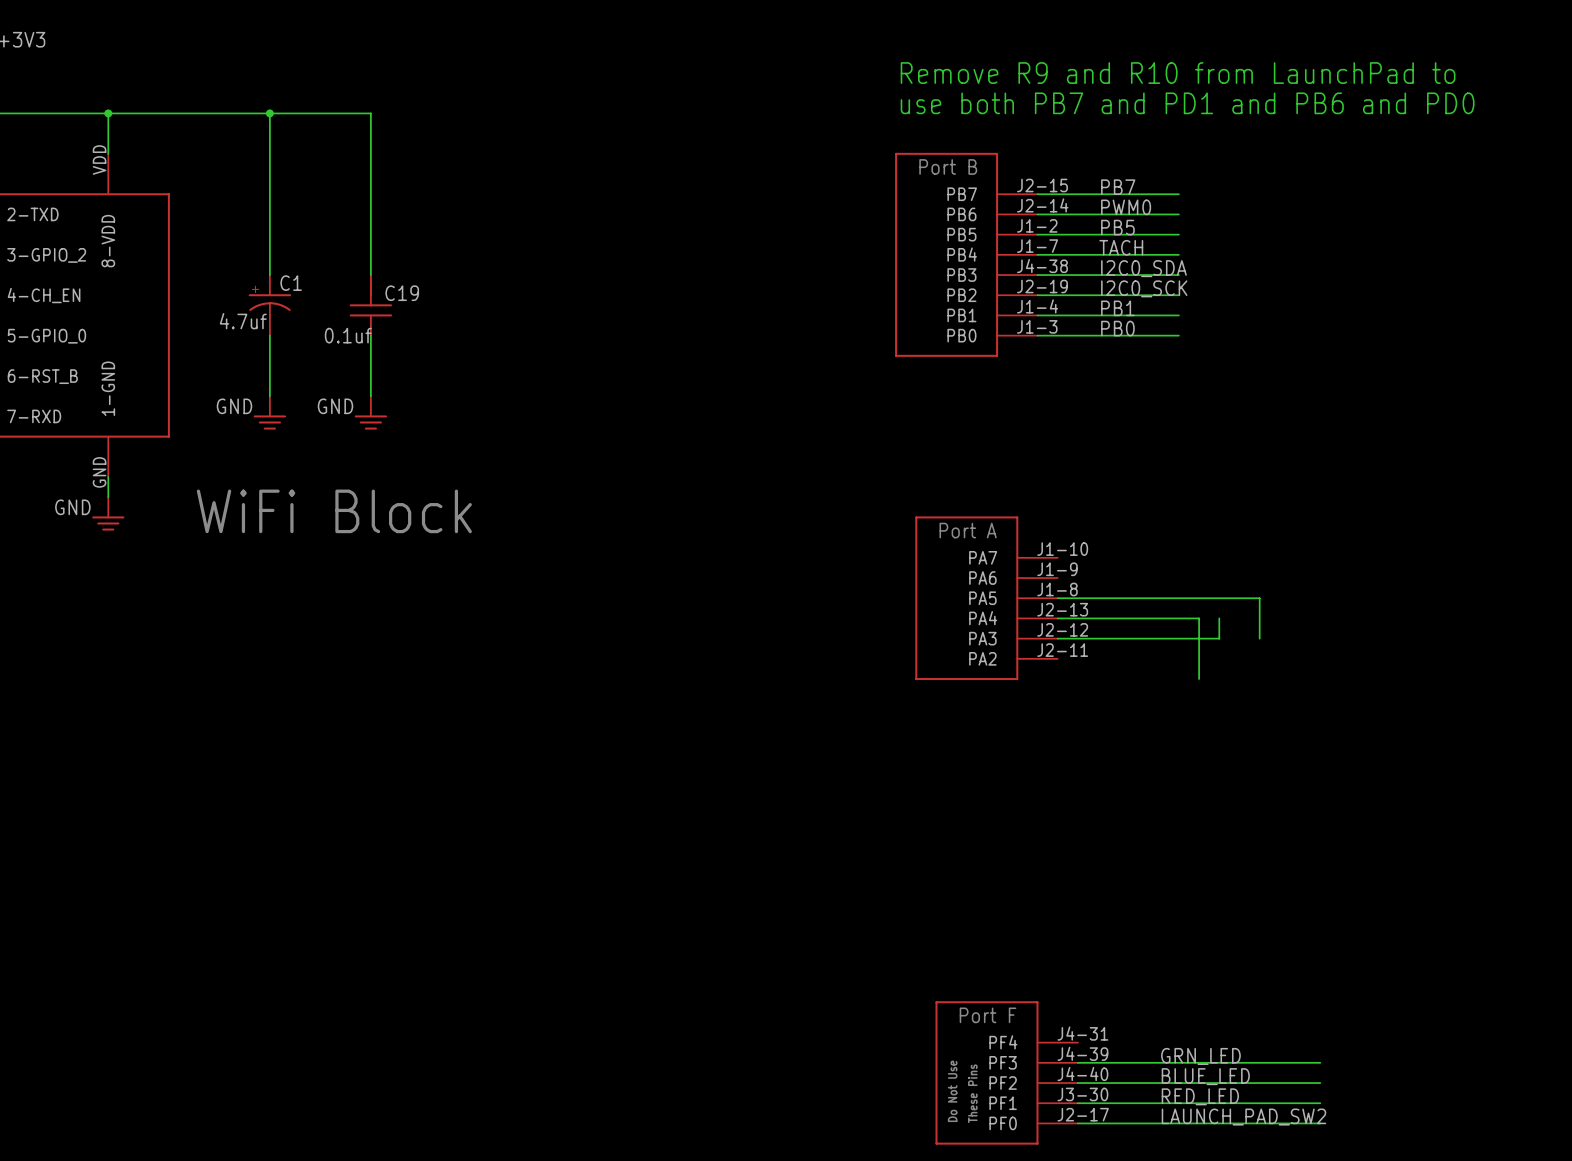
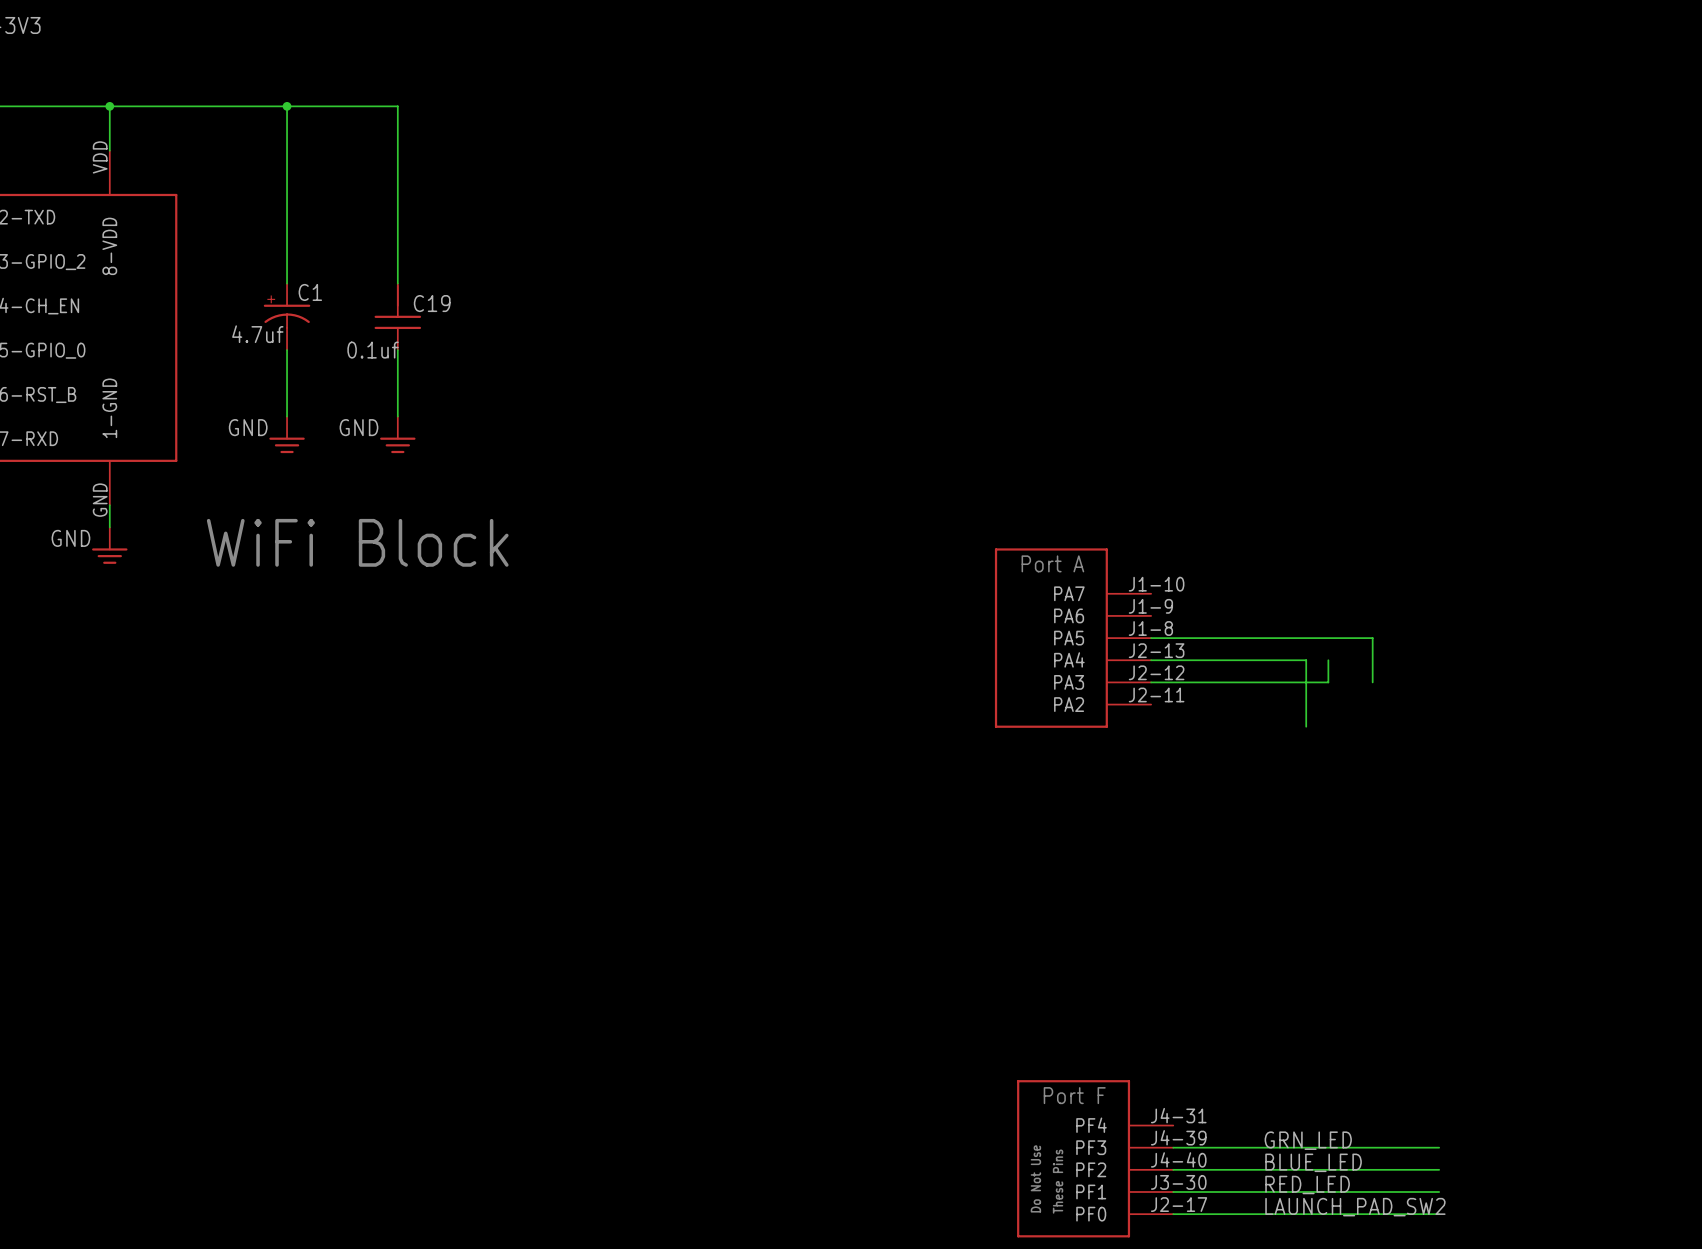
text: Remove R9 and R10 from LaunchPad to (1178, 73) -> none
text: use both PB7 and PD1 and PB6 and PD0 (1187, 103) -> none
label: PB7 (1118, 187) -> none
wire: (1037, 194) (1178, 194) -> none
label: PWM0 (1126, 207) -> none
wire: (1037, 214) (1178, 214) -> none
label: PB5 (1117, 227) -> none
wire: (1037, 234) (1178, 234) -> none
label: TACH (1121, 247) -> none
part: (966, 254) -> none
wire: (1037, 254) (1178, 254) -> none
label: I2C0_SDA (1143, 268) -> none
wire: (1037, 275) (1178, 275) -> none
label: I2C0_SCK (1144, 288) -> none
wire: (1037, 295) (1178, 295) -> none
label: PB1 (1117, 308) -> none
wire: (1037, 315) (1178, 315) -> none
label: PB0 (1117, 328) -> none
wire: (1037, 335) (1178, 335) -> none

